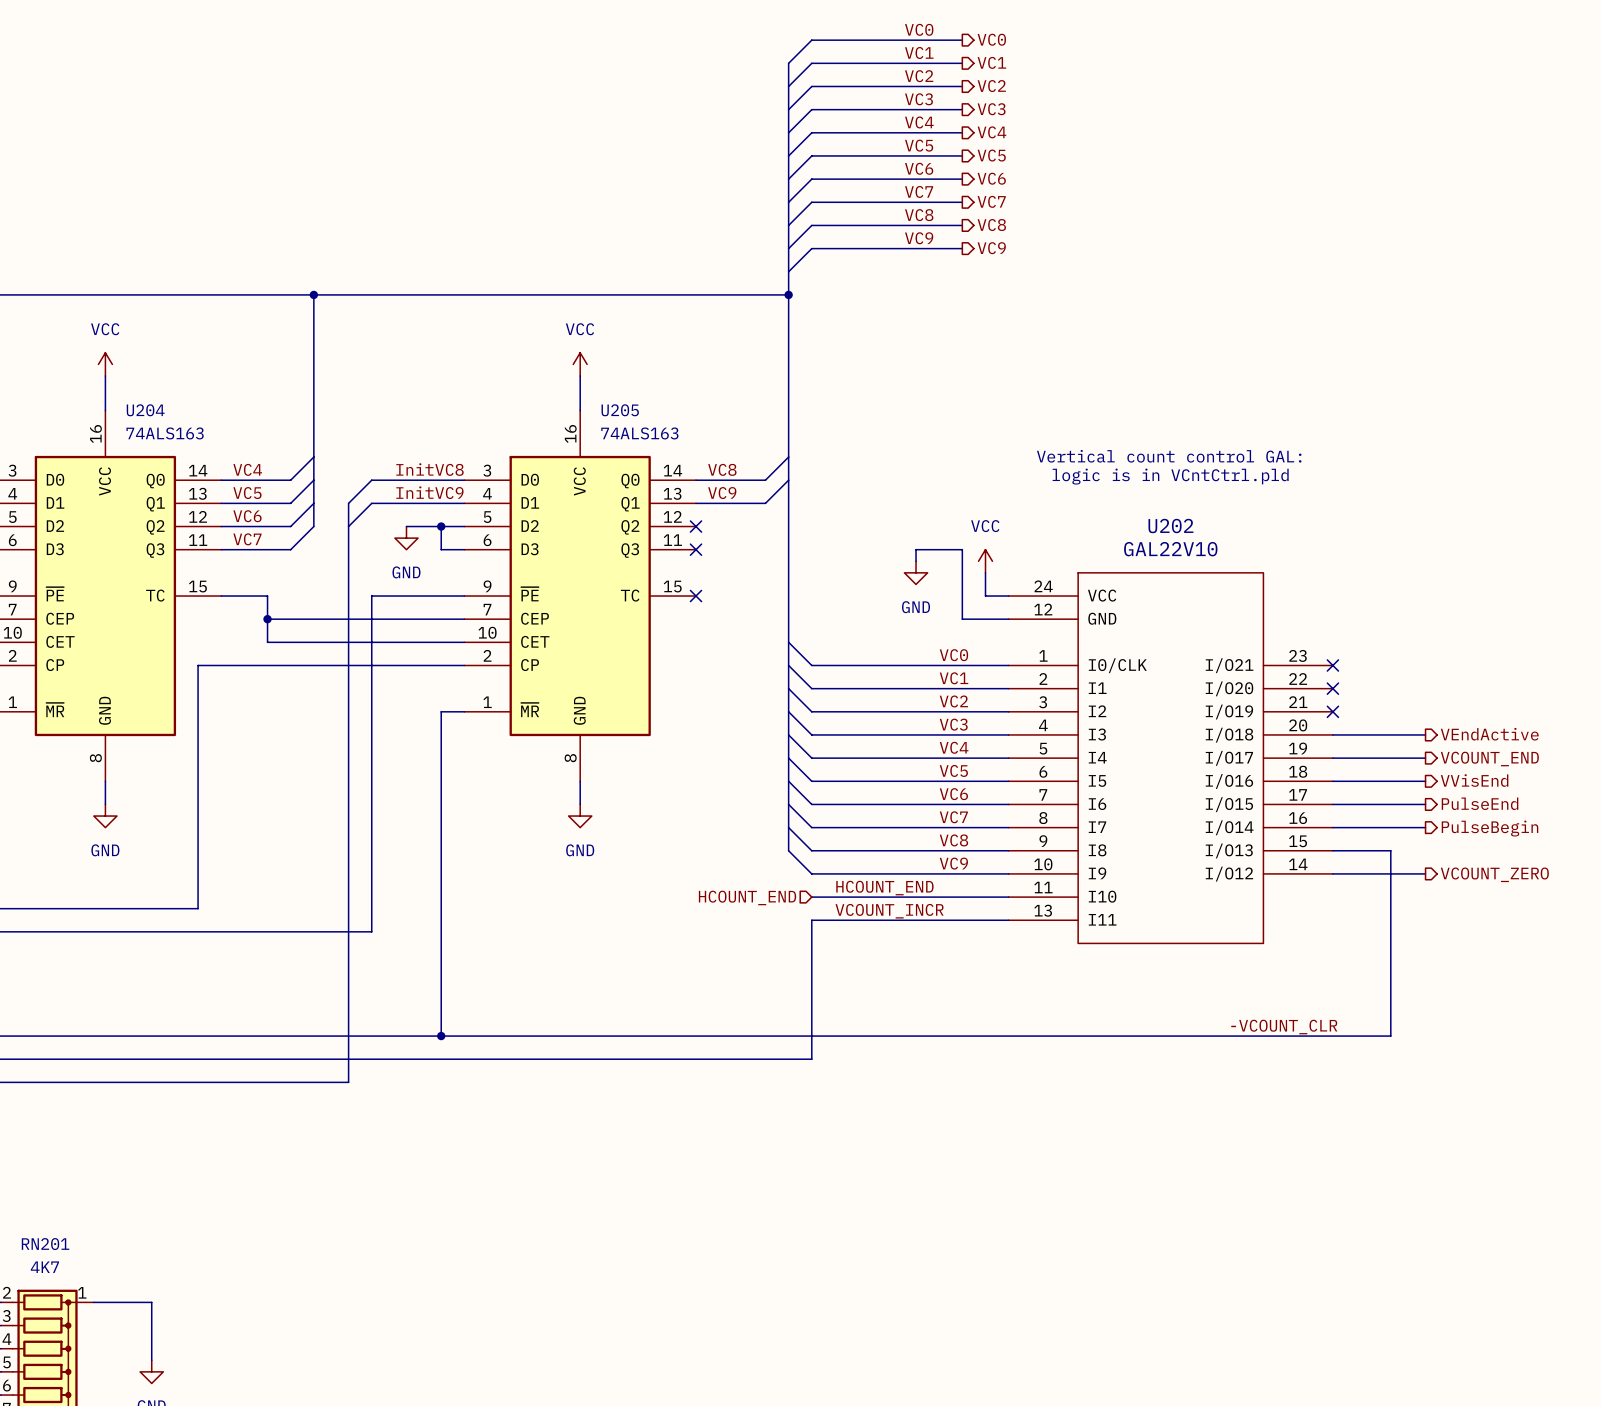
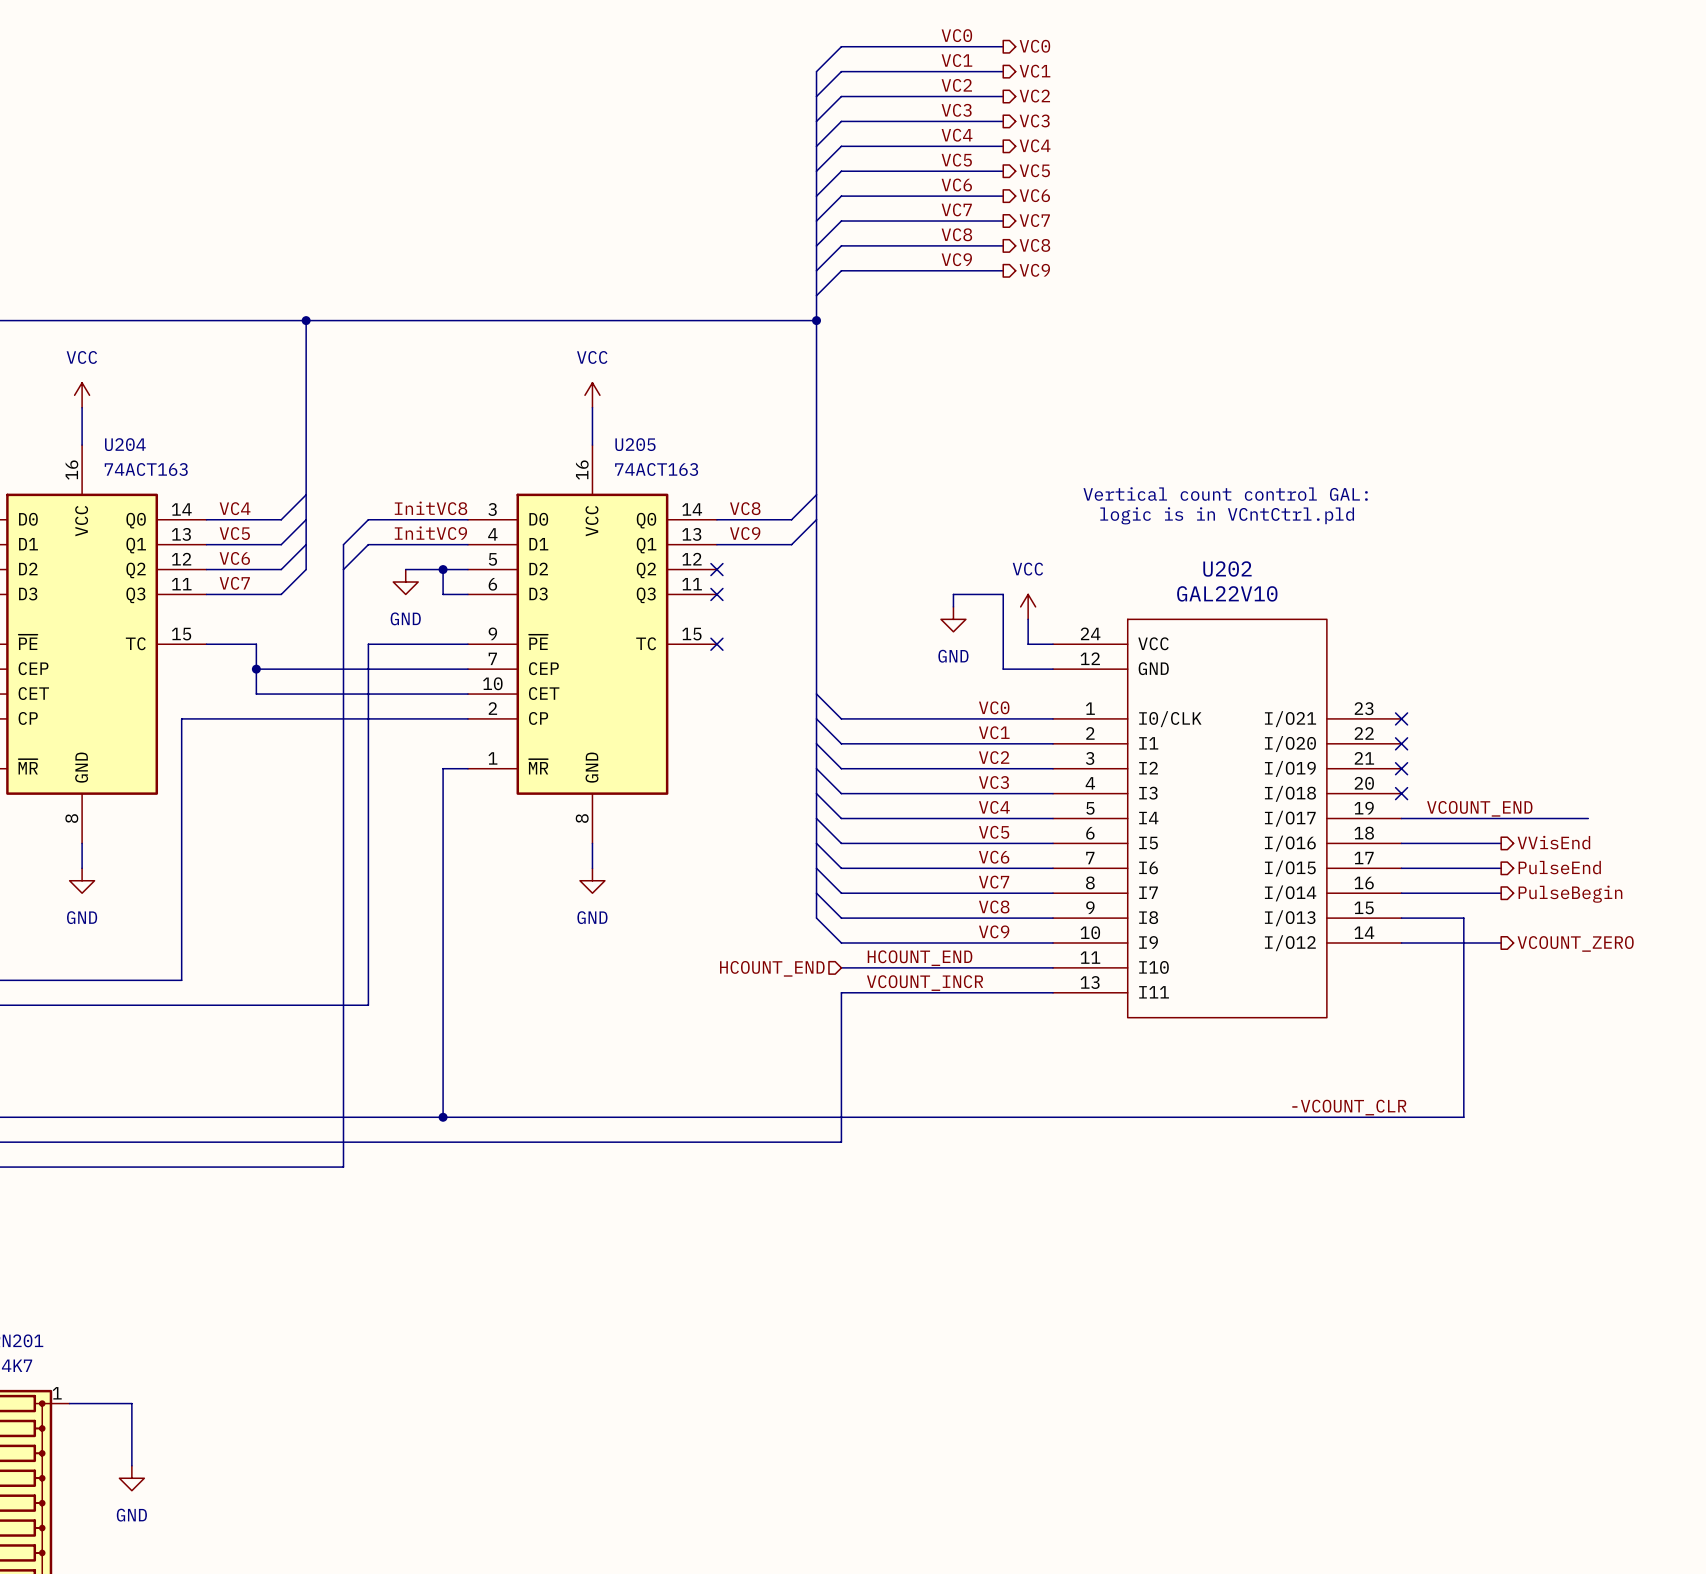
U204 value: 74ALS163 (165, 433) -> 74ACT163 (146, 469)
U205 value: 74ALS163 (639, 433) -> 74ACT163 (656, 469)
wire: (1332, 734) (1425, 734) -> none
no-connect mark: none -> (1401, 793)
hierarchical label: VEndActive (1489, 734) -> none
label: none -> VCOUNT_END (1479, 808)
wire: none -> (1501, 818) (1588, 818)
hierarchical label: VCOUNT_END (1489, 759) -> none

